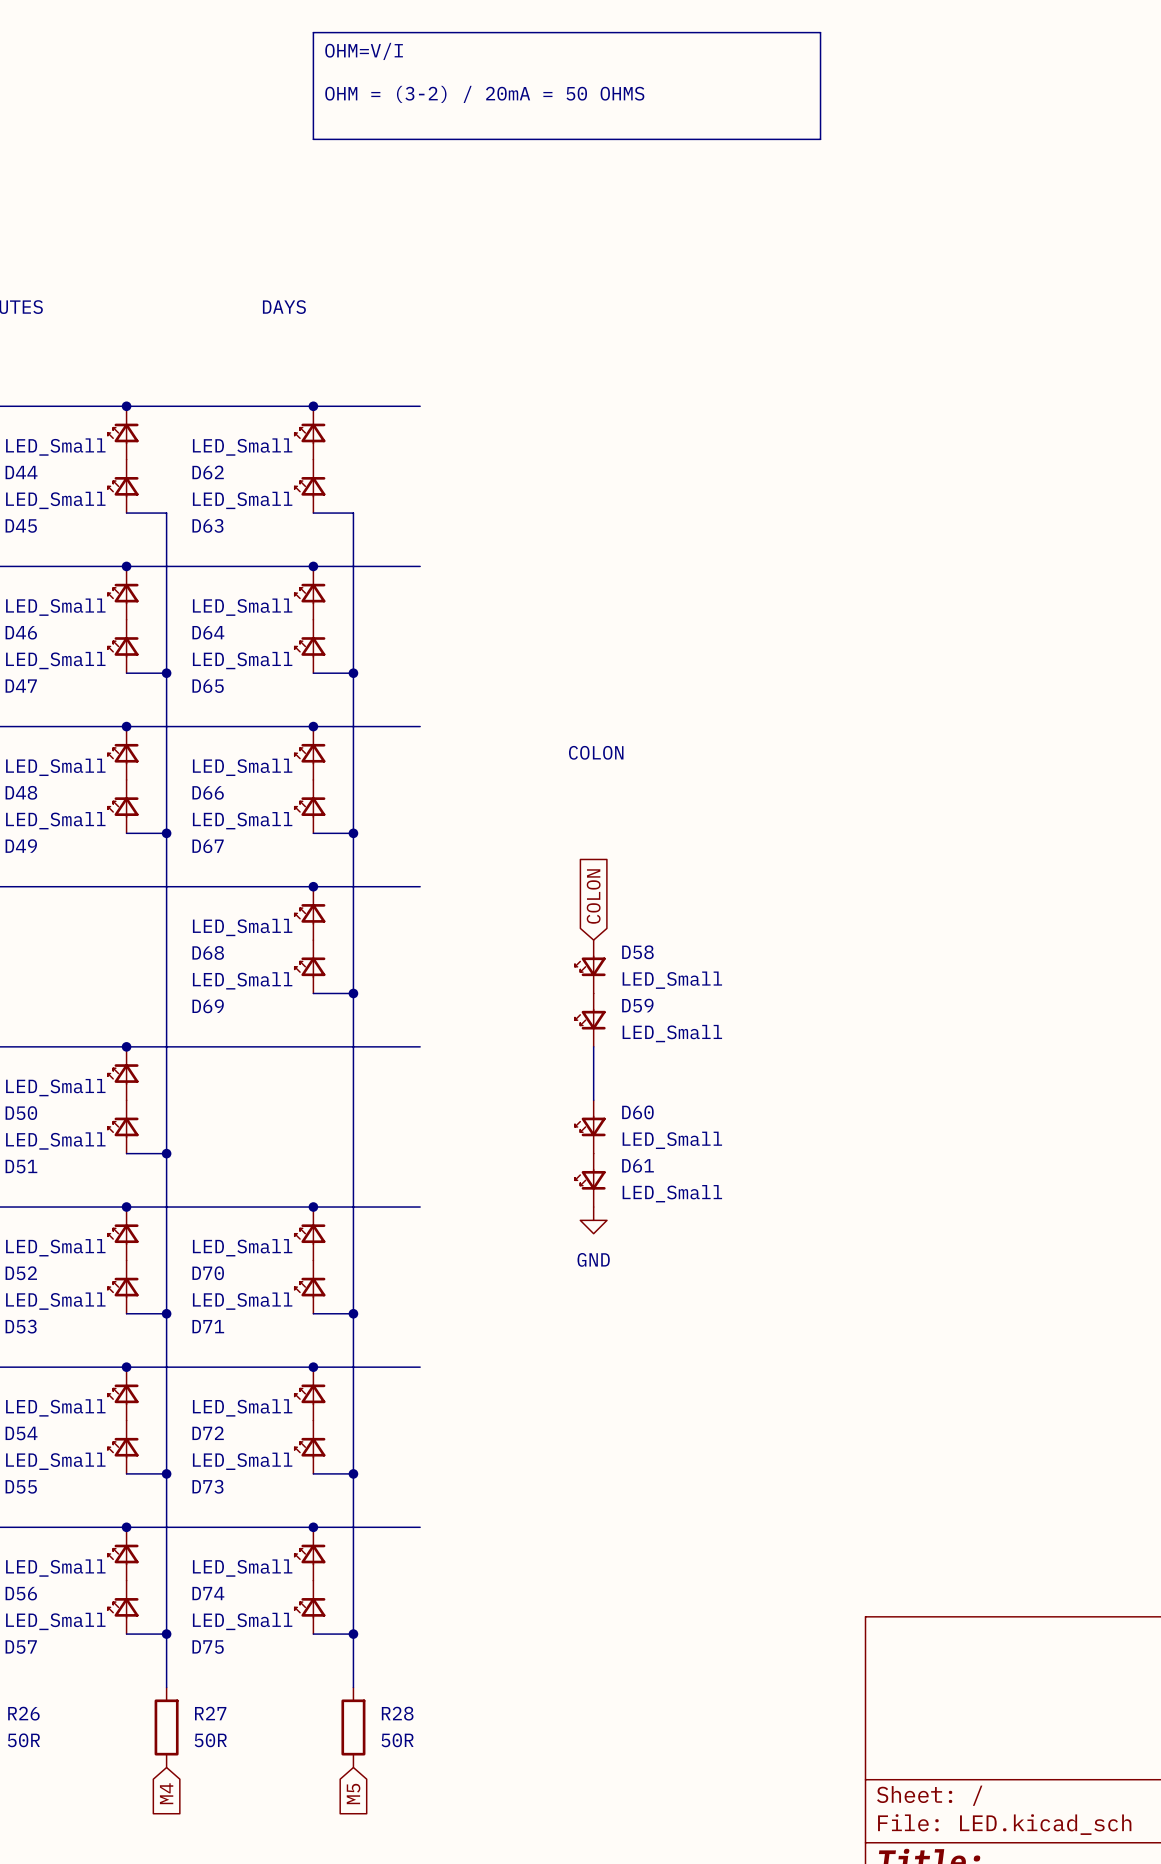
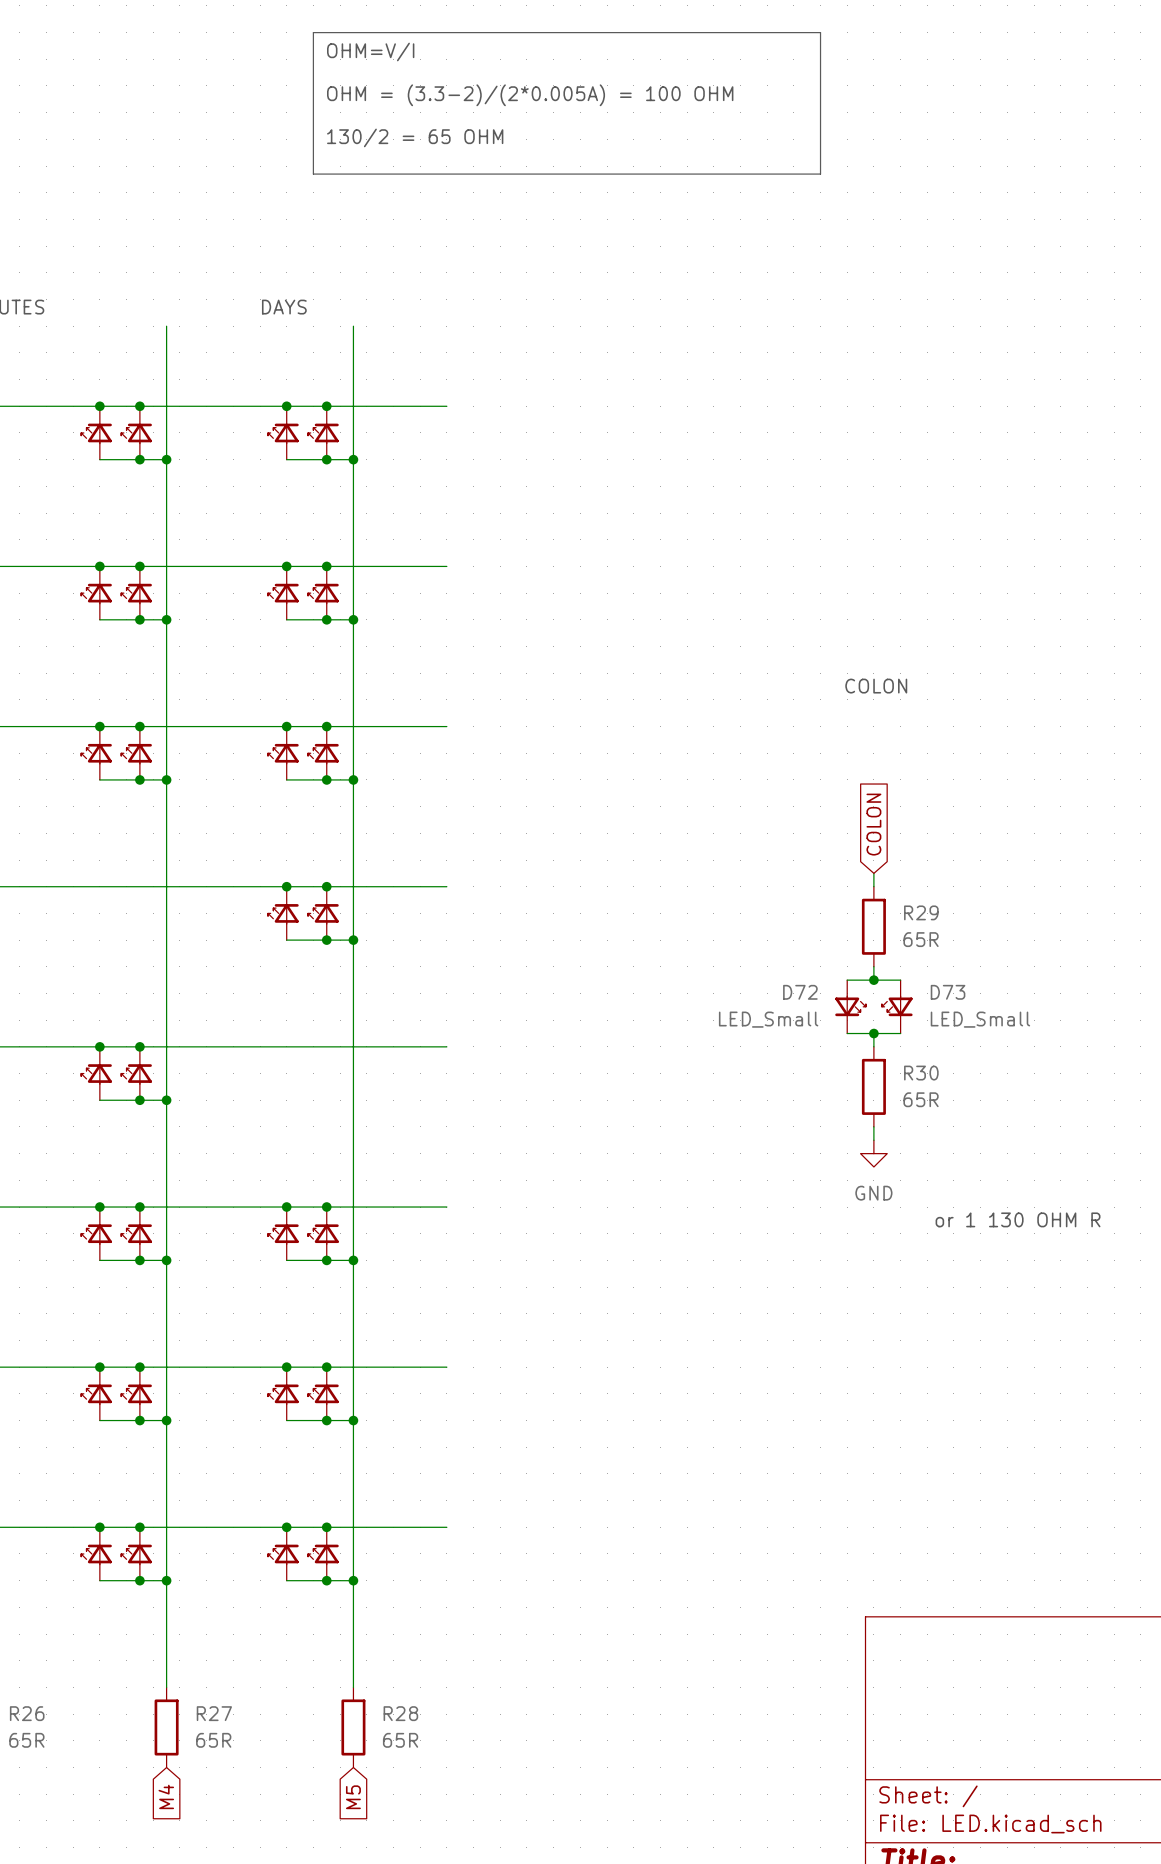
text: OHM = (3-2) / 20mA = 50 OHMS (484, 94) -> OHM = (3.3-2)/(2*0.005A) = 100 OHM (530, 95)
text: none -> 130/2 = 65 OHM (415, 137)
line: (313, 139) (820, 139) -> (313, 139) (313, 174) (820, 174) (820, 139)
junction: none -> (99, 406)
junction: (126, 406) -> none
junction: none -> (139, 406)
junction: none -> (286, 406)
junction: (313, 406) -> none
junction: none -> (326, 406)
wire: none -> (420, 406) (446, 406)
part: none -> (96, 432)
D44: LED_Small (123, 432) -> none
part: none -> (136, 432)
part: none -> (283, 432)
D62: LED_Small (310, 432) -> none
part: none -> (323, 432)
wire: none -> (99, 459) (166, 459)
junction: none -> (139, 459)
junction: none -> (166, 459)
wire: none -> (286, 459) (353, 459)
junction: none -> (326, 459)
junction: none -> (353, 459)
D45: LED_Small (123, 486) -> none
D63: LED_Small (310, 486) -> none
wire: (126, 513) (166, 513) -> (166, 326) (166, 513)
wire: (313, 513) (353, 513) -> (353, 326) (353, 513)
junction: none -> (99, 566)
junction: (126, 566) -> none
junction: none -> (139, 566)
junction: none -> (286, 566)
junction: (313, 566) -> none
junction: none -> (326, 566)
wire: none -> (420, 566) (446, 566)
part: none -> (96, 593)
D46: LED_Small (123, 593) -> none
part: none -> (136, 593)
part: none -> (283, 593)
D64: LED_Small (310, 593) -> none
part: none -> (323, 593)
wire: none -> (99, 619) (166, 619)
junction: none -> (139, 619)
junction: none -> (166, 619)
wire: none -> (286, 619) (353, 619)
junction: none -> (326, 619)
junction: none -> (353, 619)
D47: LED_Small (123, 646) -> none
D65: LED_Small (310, 646) -> none
wire: (126, 673) (166, 673) -> none
junction: (166, 673) -> none
wire: (313, 673) (353, 673) -> none
junction: (353, 673) -> none
text: none -> COLON (876, 686)
junction: none -> (99, 726)
junction: (126, 726) -> none
junction: none -> (139, 726)
junction: none -> (286, 726)
junction: (313, 726) -> none
junction: none -> (326, 726)
wire: none -> (420, 726) (446, 726)
text: COLON (596, 752) -> none
part: none -> (96, 753)
D48: LED_Small (123, 753) -> none
part: none -> (136, 753)
part: none -> (283, 753)
D66: LED_Small (310, 753) -> none
part: none -> (323, 753)
wire: none -> (99, 779) (166, 779)
junction: none -> (139, 779)
junction: none -> (166, 779)
wire: none -> (286, 779) (353, 779)
junction: none -> (326, 779)
junction: none -> (353, 779)
D49: LED_Small (123, 806) -> none
D67: LED_Small (310, 806) -> none
global label: none -> COLON (873, 824)
wire: (126, 833) (166, 833) -> none
junction: (166, 833) -> none
wire: (313, 833) (353, 833) -> none
junction: (353, 833) -> none
wire: none -> (873, 873) (873, 886)
junction: none -> (286, 886)
junction: (313, 886) -> none
junction: none -> (326, 886)
wire: none -> (420, 886) (446, 886)
global label: COLON (593, 896) -> none
part: none -> (283, 913)
D68: LED_Small (310, 913) -> none
part: none -> (323, 913)
R29: none -> 65R (873, 926)
wire: none -> (286, 940) (353, 940)
junction: none -> (326, 940)
junction: none -> (353, 940)
D69: LED_Small (310, 966) -> none
D58: LED_Small (590, 966) -> none
wire: none -> (873, 966) (873, 980)
wire: none -> (847, 980) (900, 980)
junction: none -> (873, 980)
wire: (313, 993) (353, 993) -> none
junction: (353, 993) -> none
D59: LED_Small (590, 1020) -> none
wire: none -> (847, 1033) (900, 1033)
wire: none -> (873, 1033) (873, 1046)
junction: none -> (873, 1033)
junction: none -> (99, 1046)
junction: (126, 1046) -> none
junction: none -> (139, 1046)
wire: none -> (420, 1046) (446, 1046)
wire: (593, 1046) (593, 1100) -> none
part: none -> (96, 1073)
D50: LED_Small (123, 1073) -> none
part: none -> (136, 1073)
R30: none -> 65R (873, 1086)
wire: none -> (99, 1100) (166, 1100)
junction: none -> (139, 1100)
junction: none -> (166, 1100)
D51: LED_Small (123, 1126) -> none
D60: LED_Small (590, 1126) -> none
wire: none -> (873, 1126) (873, 1140)
wire: (126, 1153) (166, 1153) -> none
junction: (166, 1153) -> none
power symbol: none -> GND (873, 1153)
D61: LED_Small (590, 1180) -> none
junction: none -> (99, 1207)
junction: (126, 1207) -> none
junction: none -> (139, 1207)
junction: none -> (286, 1207)
junction: (313, 1207) -> none
junction: none -> (326, 1207)
wire: none -> (420, 1207) (446, 1207)
text: none -> or 1 130 OHM R (1018, 1219)
power symbol: GND (593, 1220) -> none
part: none -> (96, 1233)
D52: LED_Small (123, 1233) -> none
part: none -> (136, 1233)
part: none -> (283, 1233)
D70: LED_Small (310, 1233) -> none
part: none -> (323, 1233)
wire: none -> (99, 1260) (166, 1260)
junction: none -> (139, 1260)
junction: none -> (166, 1260)
wire: none -> (286, 1260) (353, 1260)
junction: none -> (326, 1260)
junction: none -> (353, 1260)
D53: LED_Small (123, 1287) -> none
D71: LED_Small (310, 1287) -> none
wire: (126, 1313) (166, 1313) -> none
junction: (166, 1313) -> none
wire: (313, 1313) (353, 1313) -> none
junction: (353, 1313) -> none
junction: none -> (99, 1367)
junction: (126, 1367) -> none
junction: none -> (139, 1367)
junction: none -> (286, 1367)
junction: (313, 1367) -> none
junction: none -> (326, 1367)
wire: none -> (420, 1367) (446, 1367)
part: none -> (96, 1393)
D54: LED_Small (123, 1393) -> none
part: none -> (136, 1393)
part: none -> (283, 1393)
D72 position: (310, 1393) -> (850, 1006)
part: none -> (323, 1393)
D72 rotation: 0° (310, 1394) -> 180° (850, 1006)
D72 value position: LED_Small (242, 1407) -> LED_Small (768, 1019)
wire: none -> (99, 1420) (166, 1420)
junction: none -> (139, 1420)
junction: none -> (166, 1420)
wire: none -> (286, 1420) (353, 1420)
junction: none -> (326, 1420)
junction: none -> (353, 1420)
D72 name position: D72 (208, 1433) -> D72 (800, 992)
D55: LED_Small (123, 1447) -> none
D73 flip: as is (310, 1447) -> up-down (897, 1006)
D73 position: (310, 1447) -> (897, 1006)
D73 value position: LED_Small (242, 1461) -> LED_Small (980, 1019)
wire: (126, 1473) (166, 1473) -> none
junction: (166, 1473) -> none
wire: (313, 1473) (353, 1473) -> none
junction: (353, 1473) -> none
D73 name position: D73 (207, 1486) -> D73 (948, 992)
junction: none -> (99, 1527)
junction: (126, 1527) -> none
junction: none -> (139, 1527)
junction: none -> (286, 1527)
junction: (313, 1527) -> none
junction: none -> (326, 1527)
wire: none -> (420, 1527) (446, 1527)
part: none -> (96, 1553)
D56: LED_Small (123, 1553) -> none
part: none -> (136, 1553)
part: none -> (283, 1553)
D74: LED_Small (310, 1553) -> none
part: none -> (323, 1553)
wire: none -> (99, 1580) (166, 1580)
junction: none -> (139, 1580)
junction: none -> (166, 1580)
wire: none -> (286, 1580) (353, 1580)
junction: none -> (326, 1580)
junction: none -> (353, 1580)
D57: LED_Small (123, 1607) -> none
D75: LED_Small (310, 1607) -> none
wire: (126, 1634) (166, 1634) -> none
junction: (166, 1634) -> none
wire: (313, 1634) (353, 1634) -> none
junction: (353, 1634) -> none
R26 value: 50R (23, 1740) -> 65R (26, 1740)
R27 value: 50R (210, 1740) -> 65R (213, 1740)
R28 value: 50R (397, 1740) -> 65R (400, 1740)

